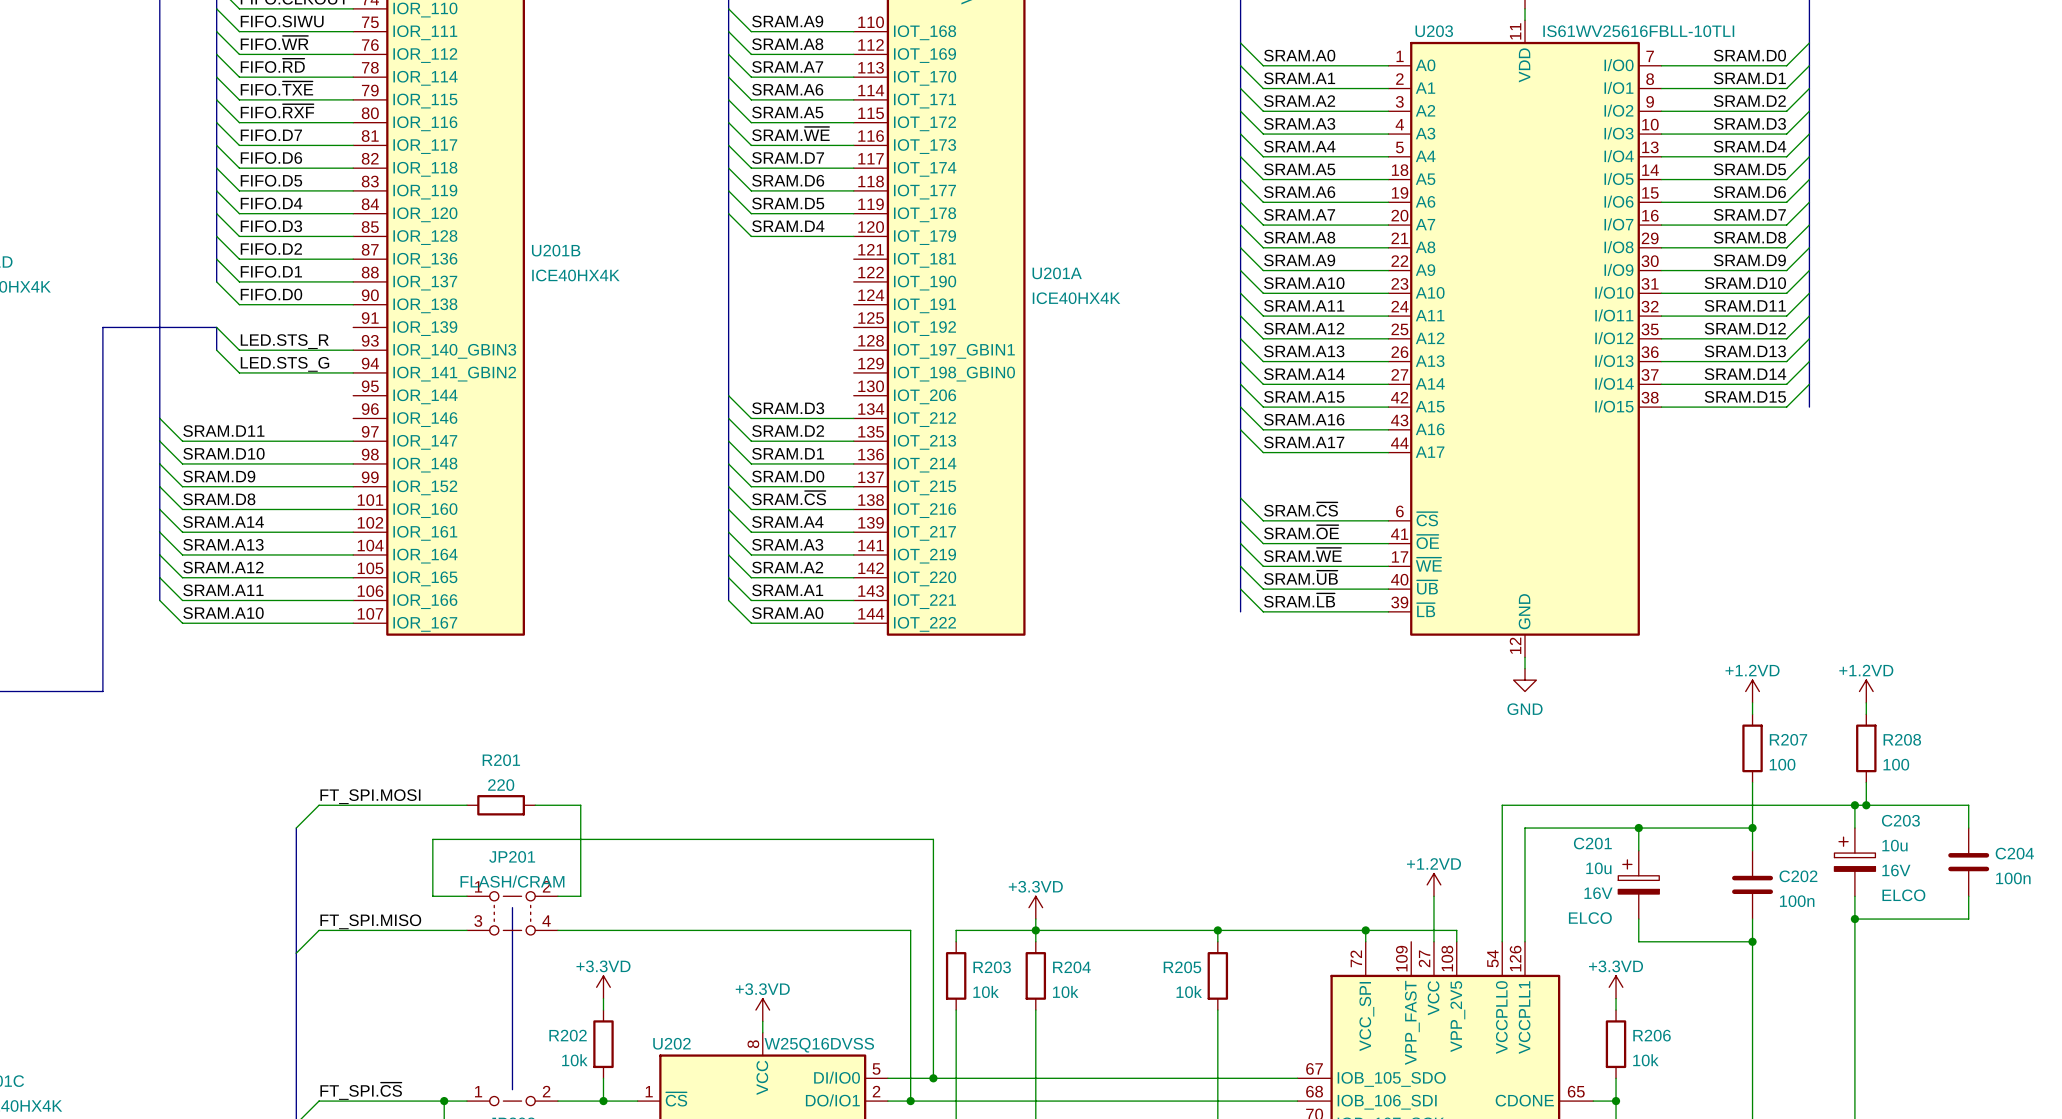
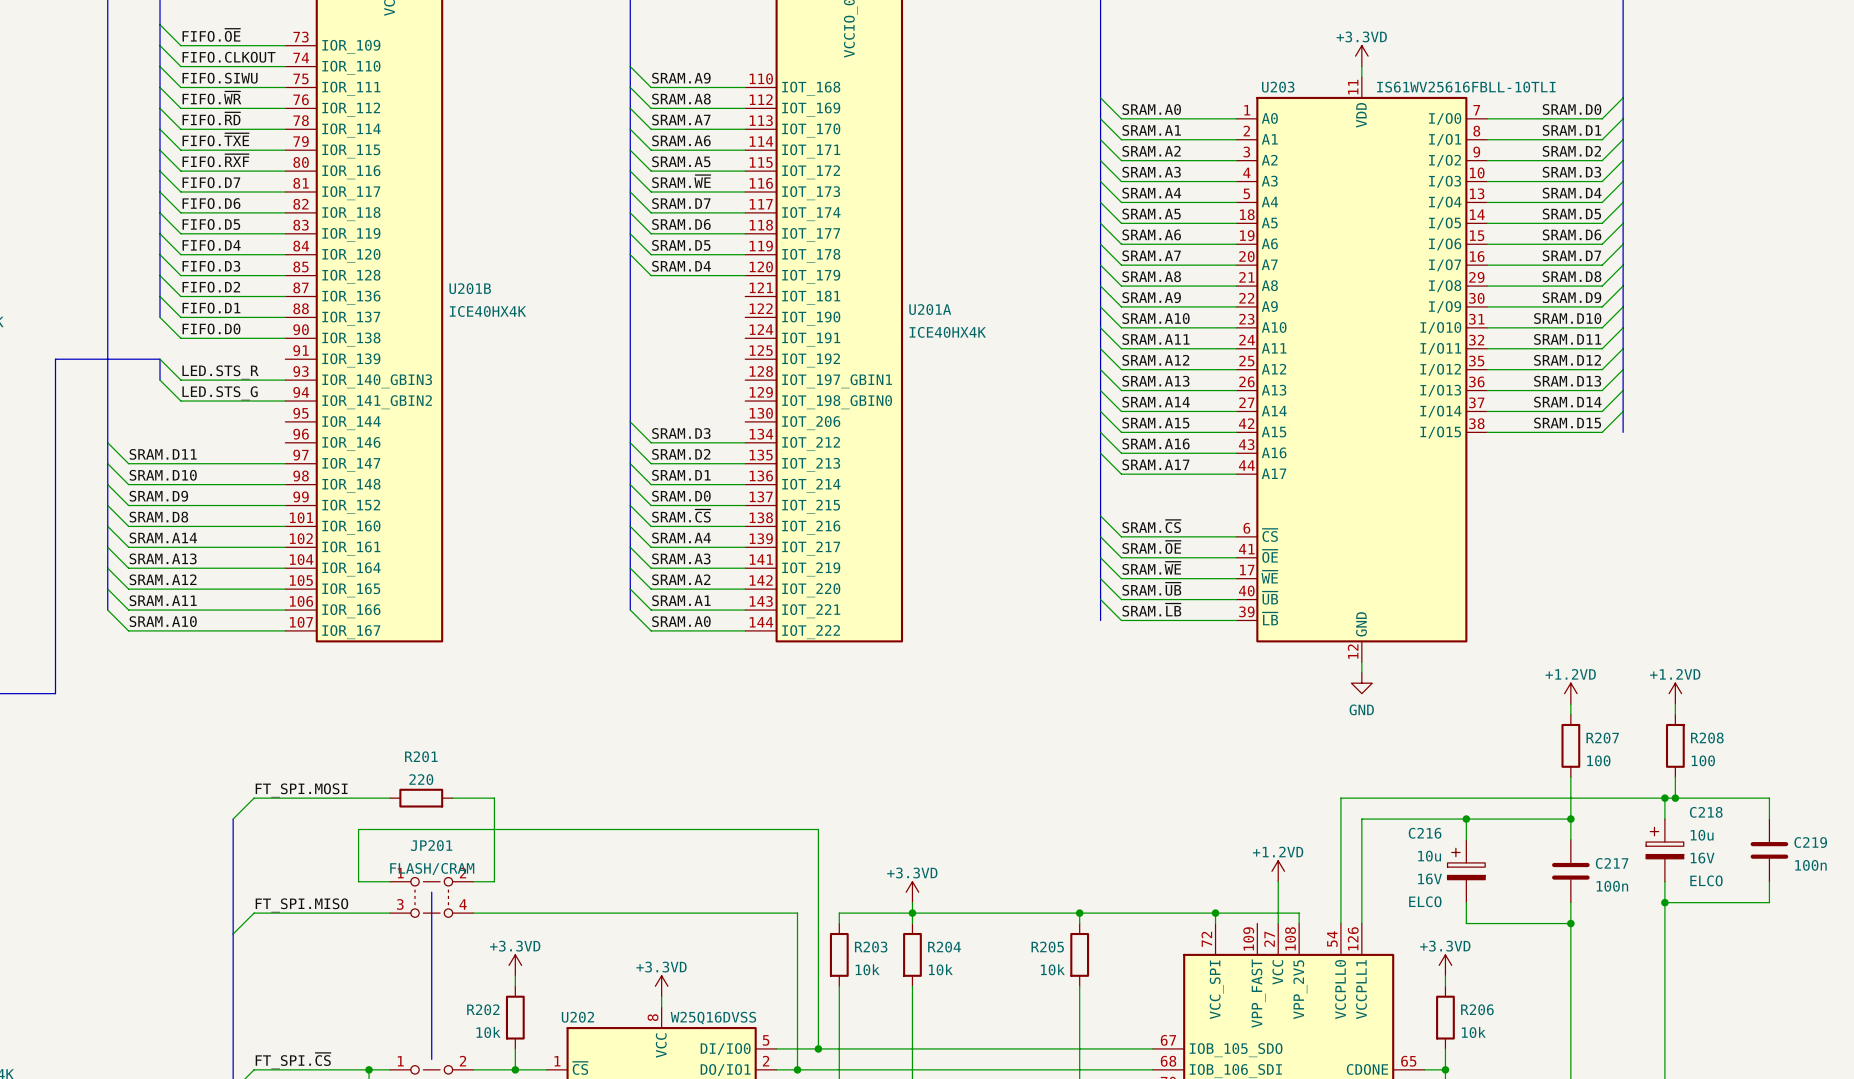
C203 name: C203 (1900, 820) -> C218 (1706, 812)
C201 name: C201 (1592, 843) -> C216 (1425, 833)
C204 name: C204 (2014, 853) -> C219 (1810, 842)
C202 name: C202 (1798, 876) -> C217 (1612, 863)

